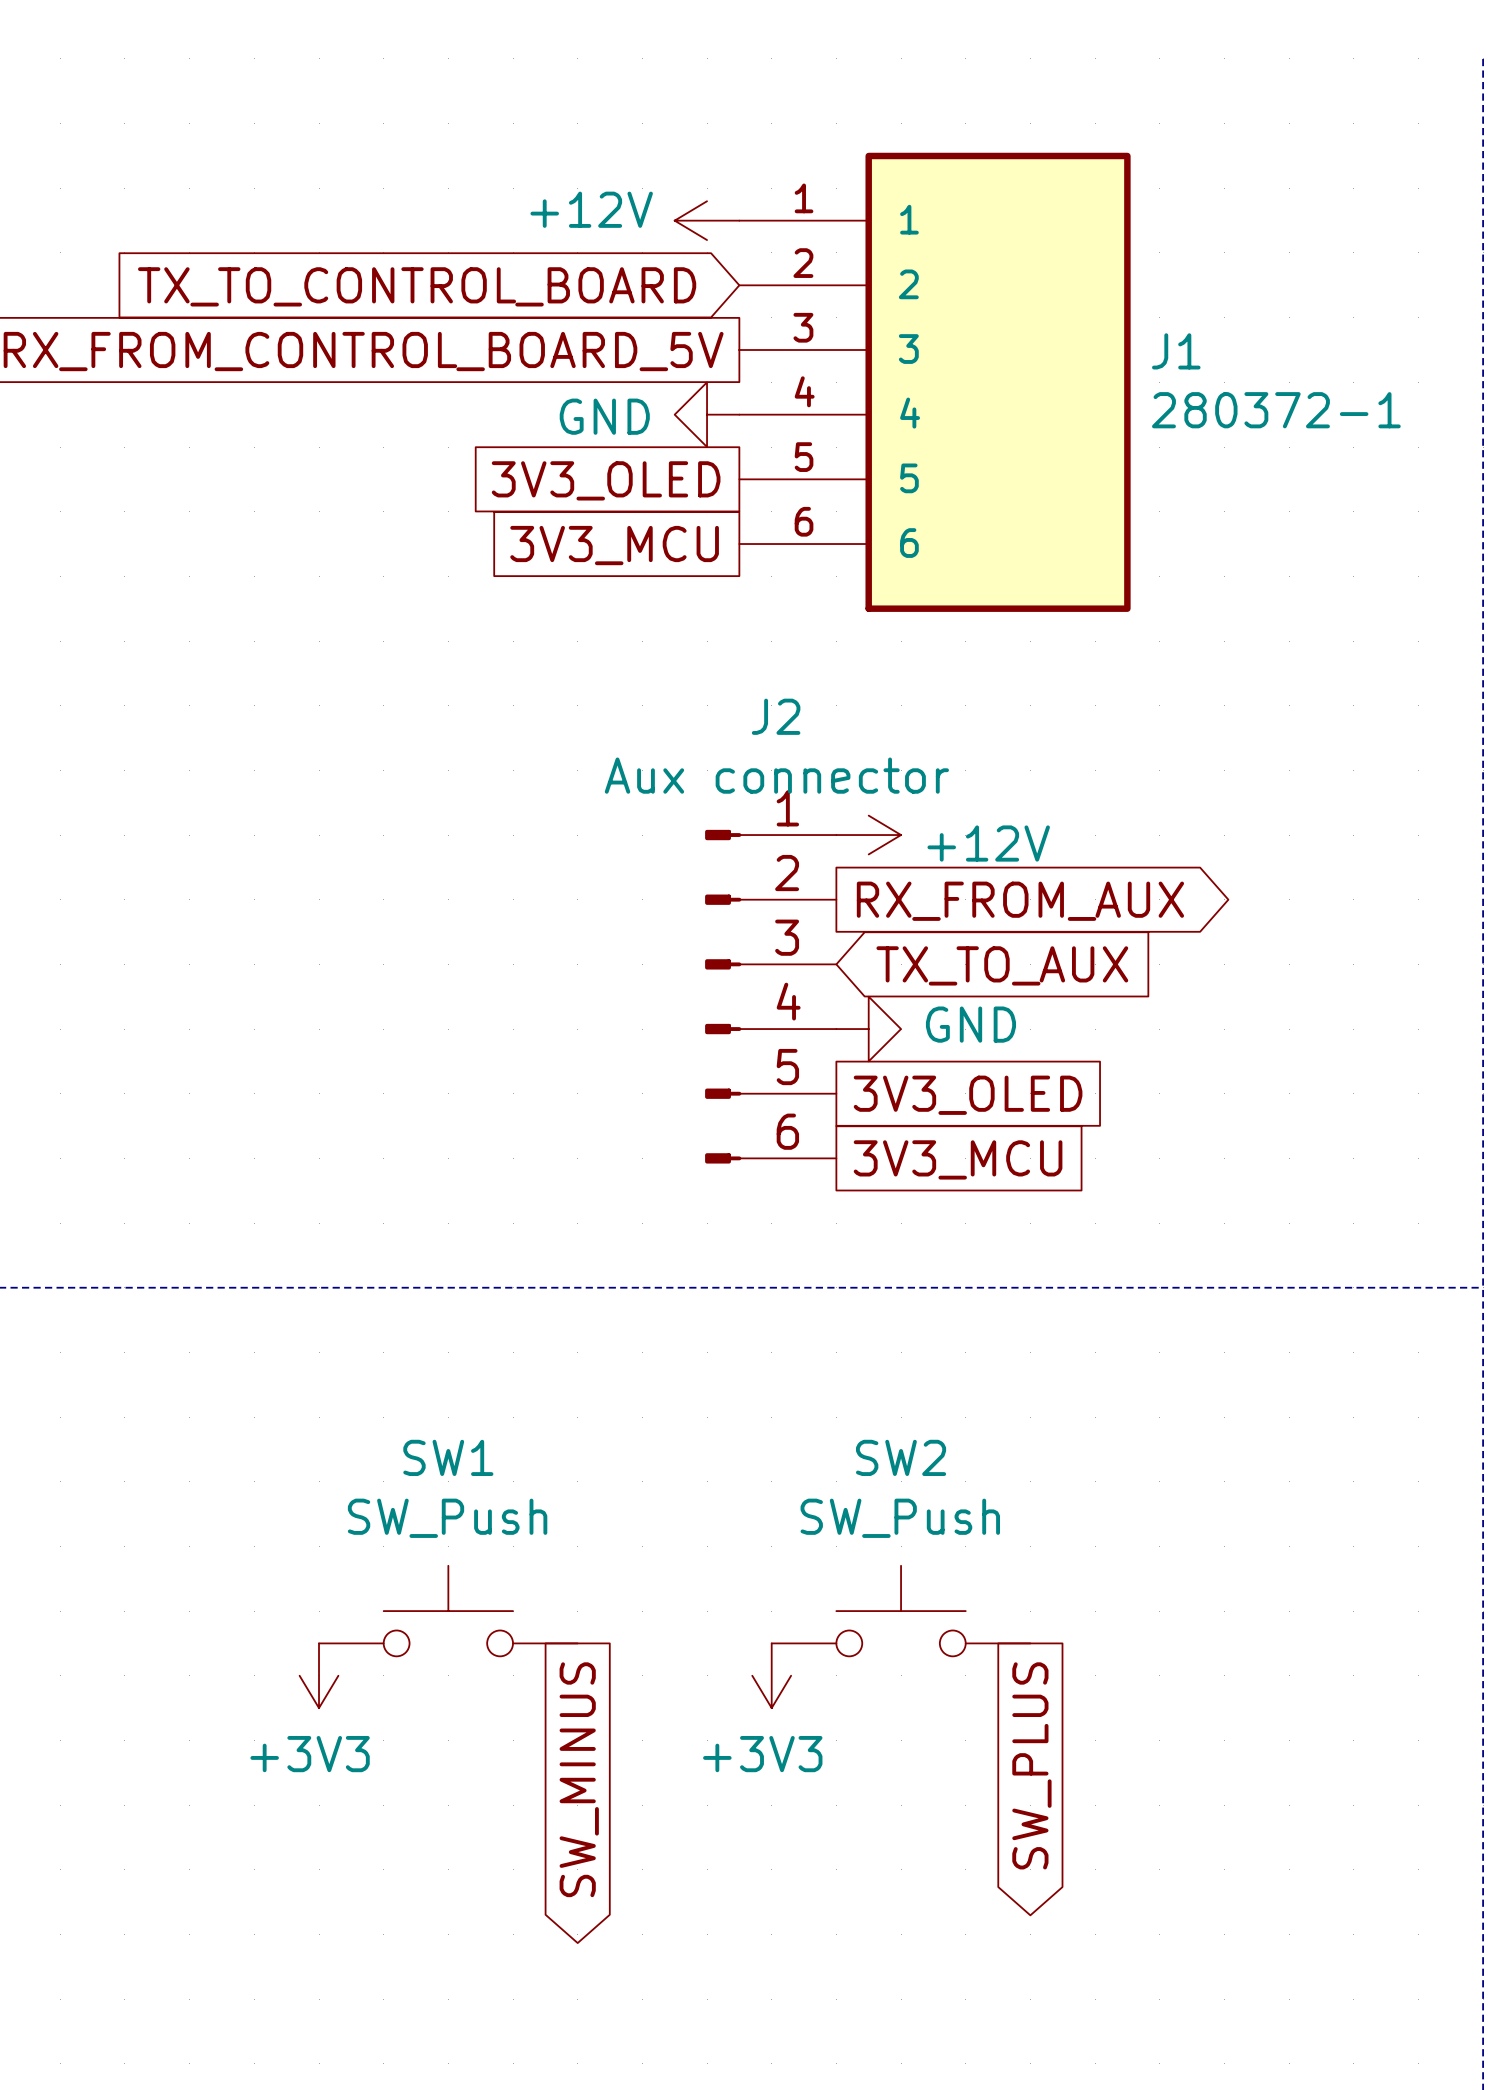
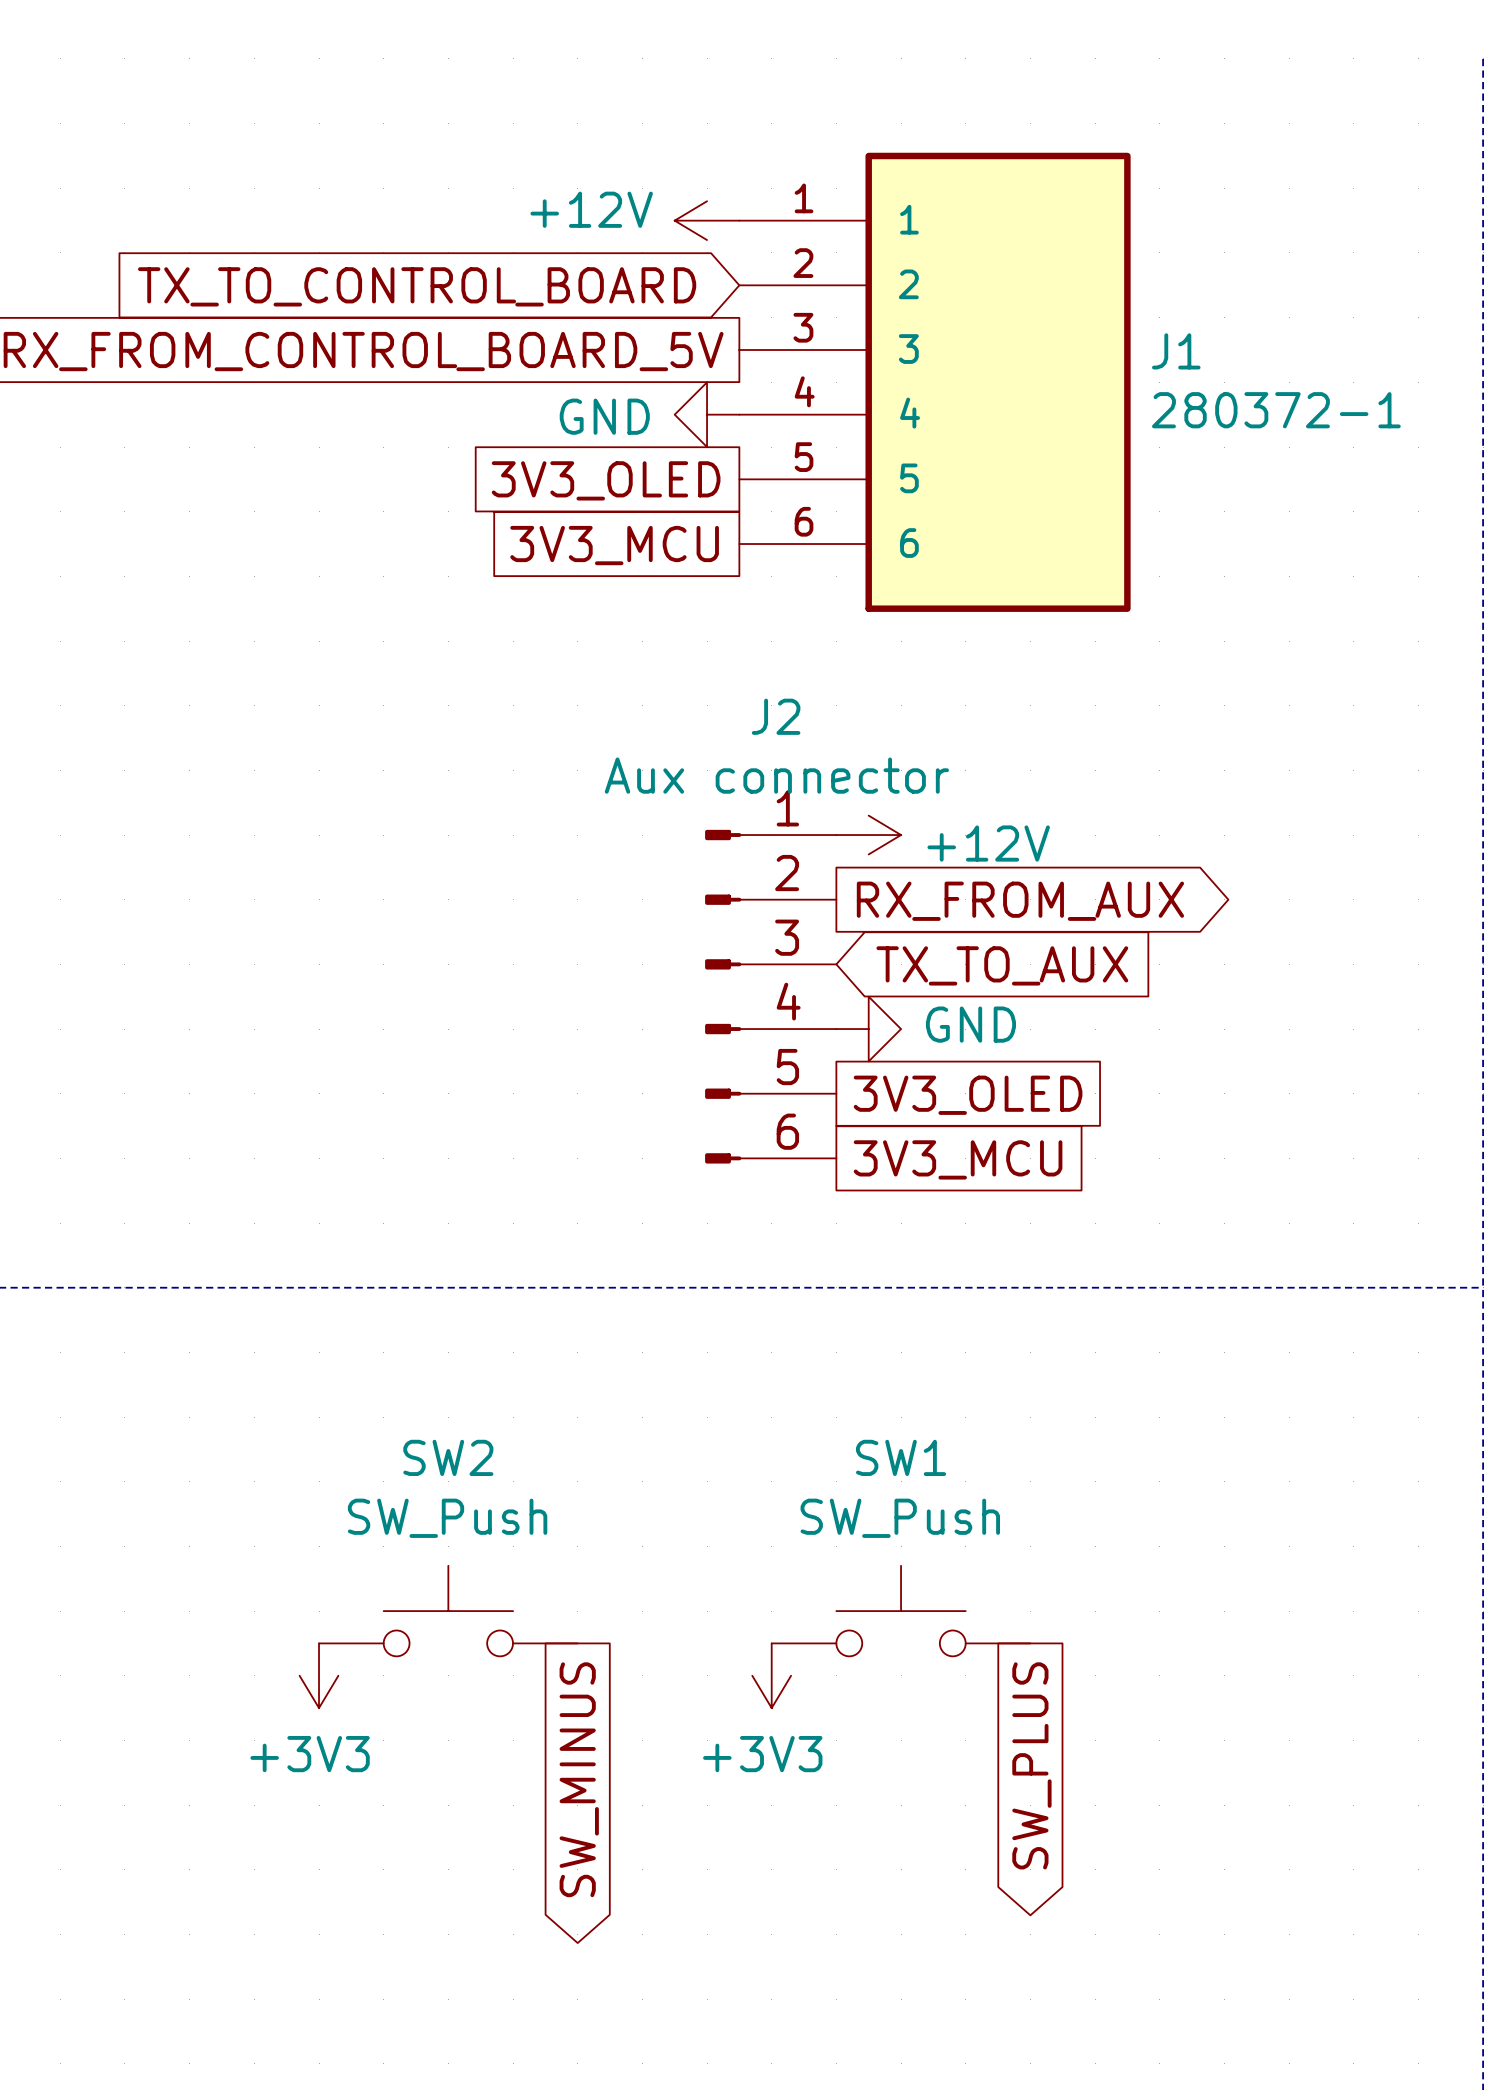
SW1 name: SW1 (448, 1457) -> SW2 (448, 1457)
SW2 name: SW2 (901, 1457) -> SW1 (901, 1457)

